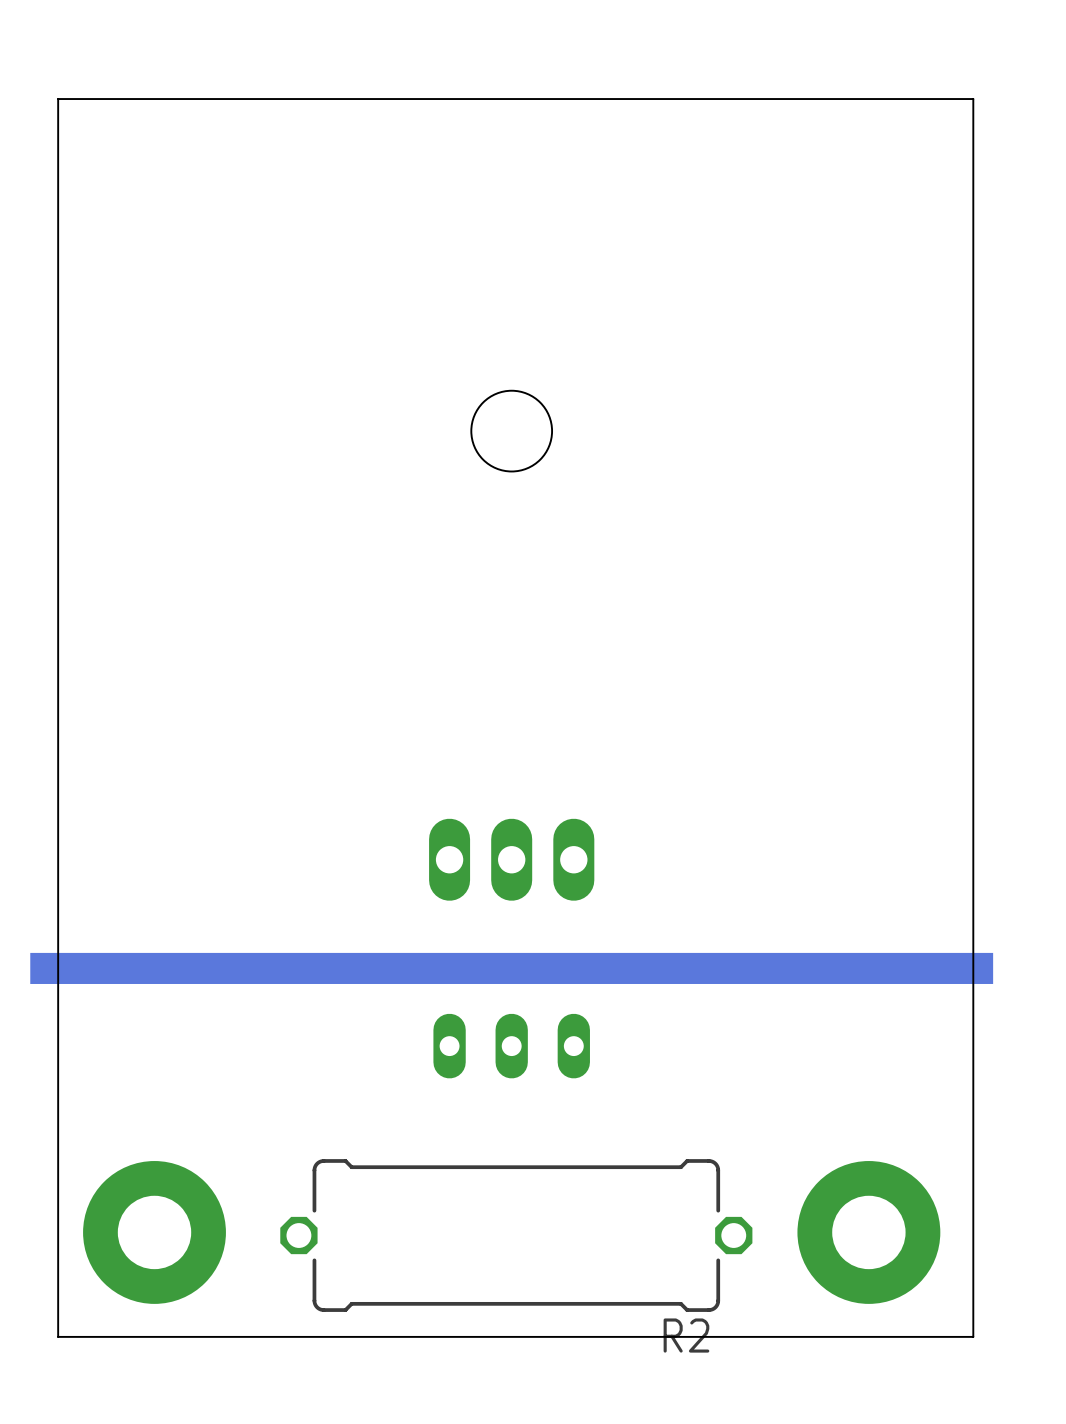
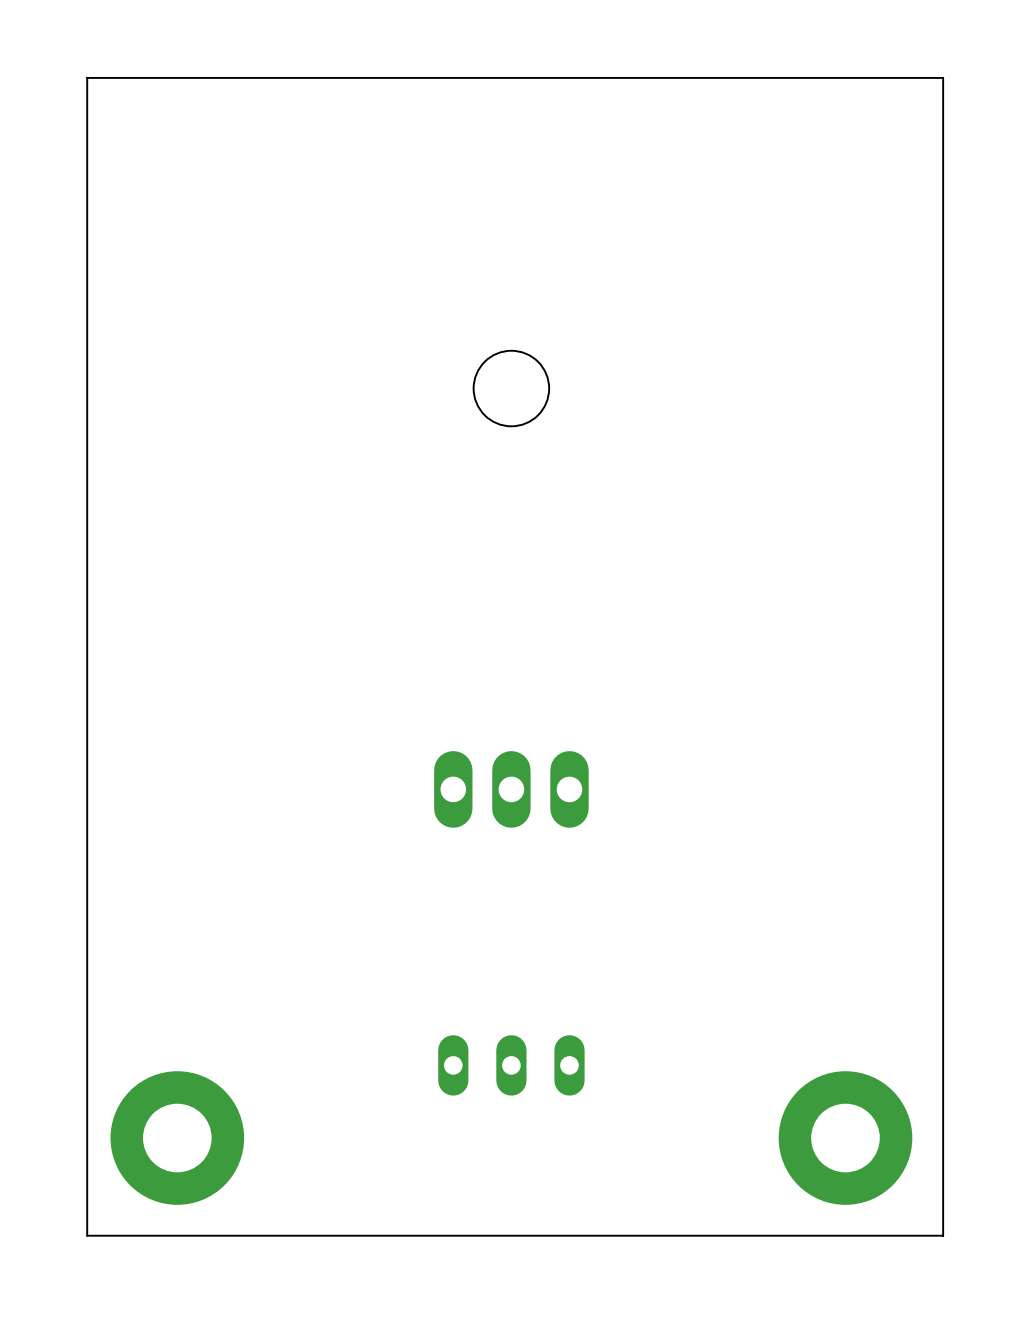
drawing: [30, 952, 994, 984] -> none
part position: (511, 1046) -> (511, 1065)
R2: (516, 1235) -> none

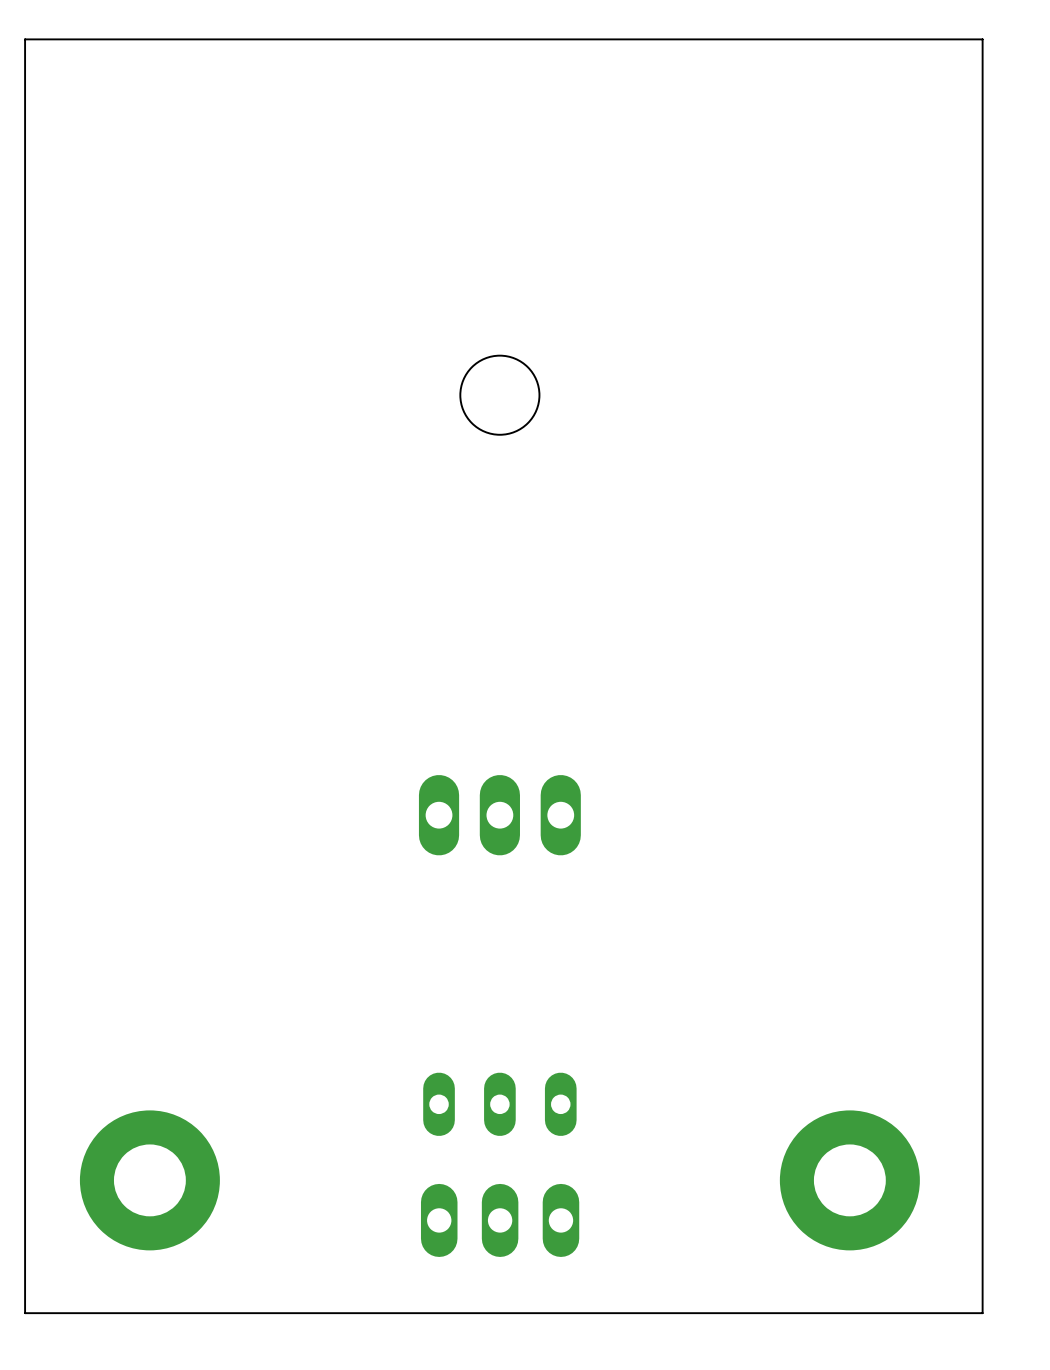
board edge: (943, 77) (87, 77) (87, 1235) (943, 1235) (943, 77) -> (982, 39) (982, 1313) (25, 1313) (25, 39) (982, 39)
part: none -> (500, 1220)

